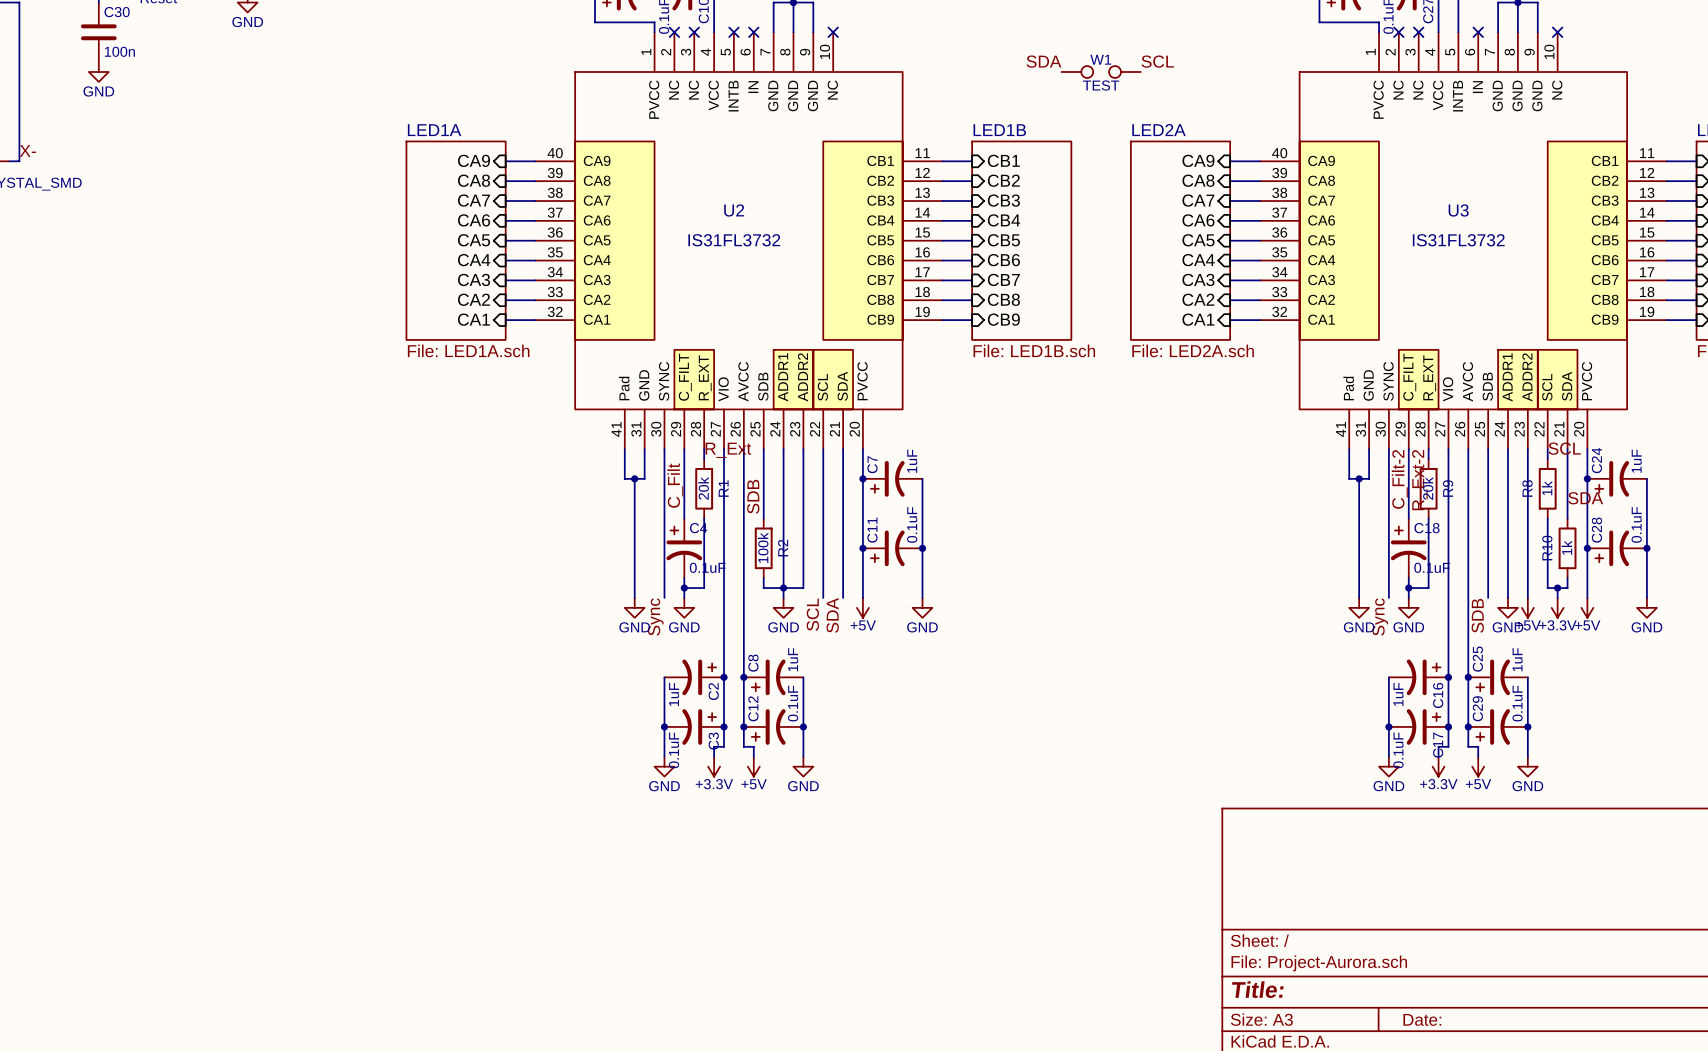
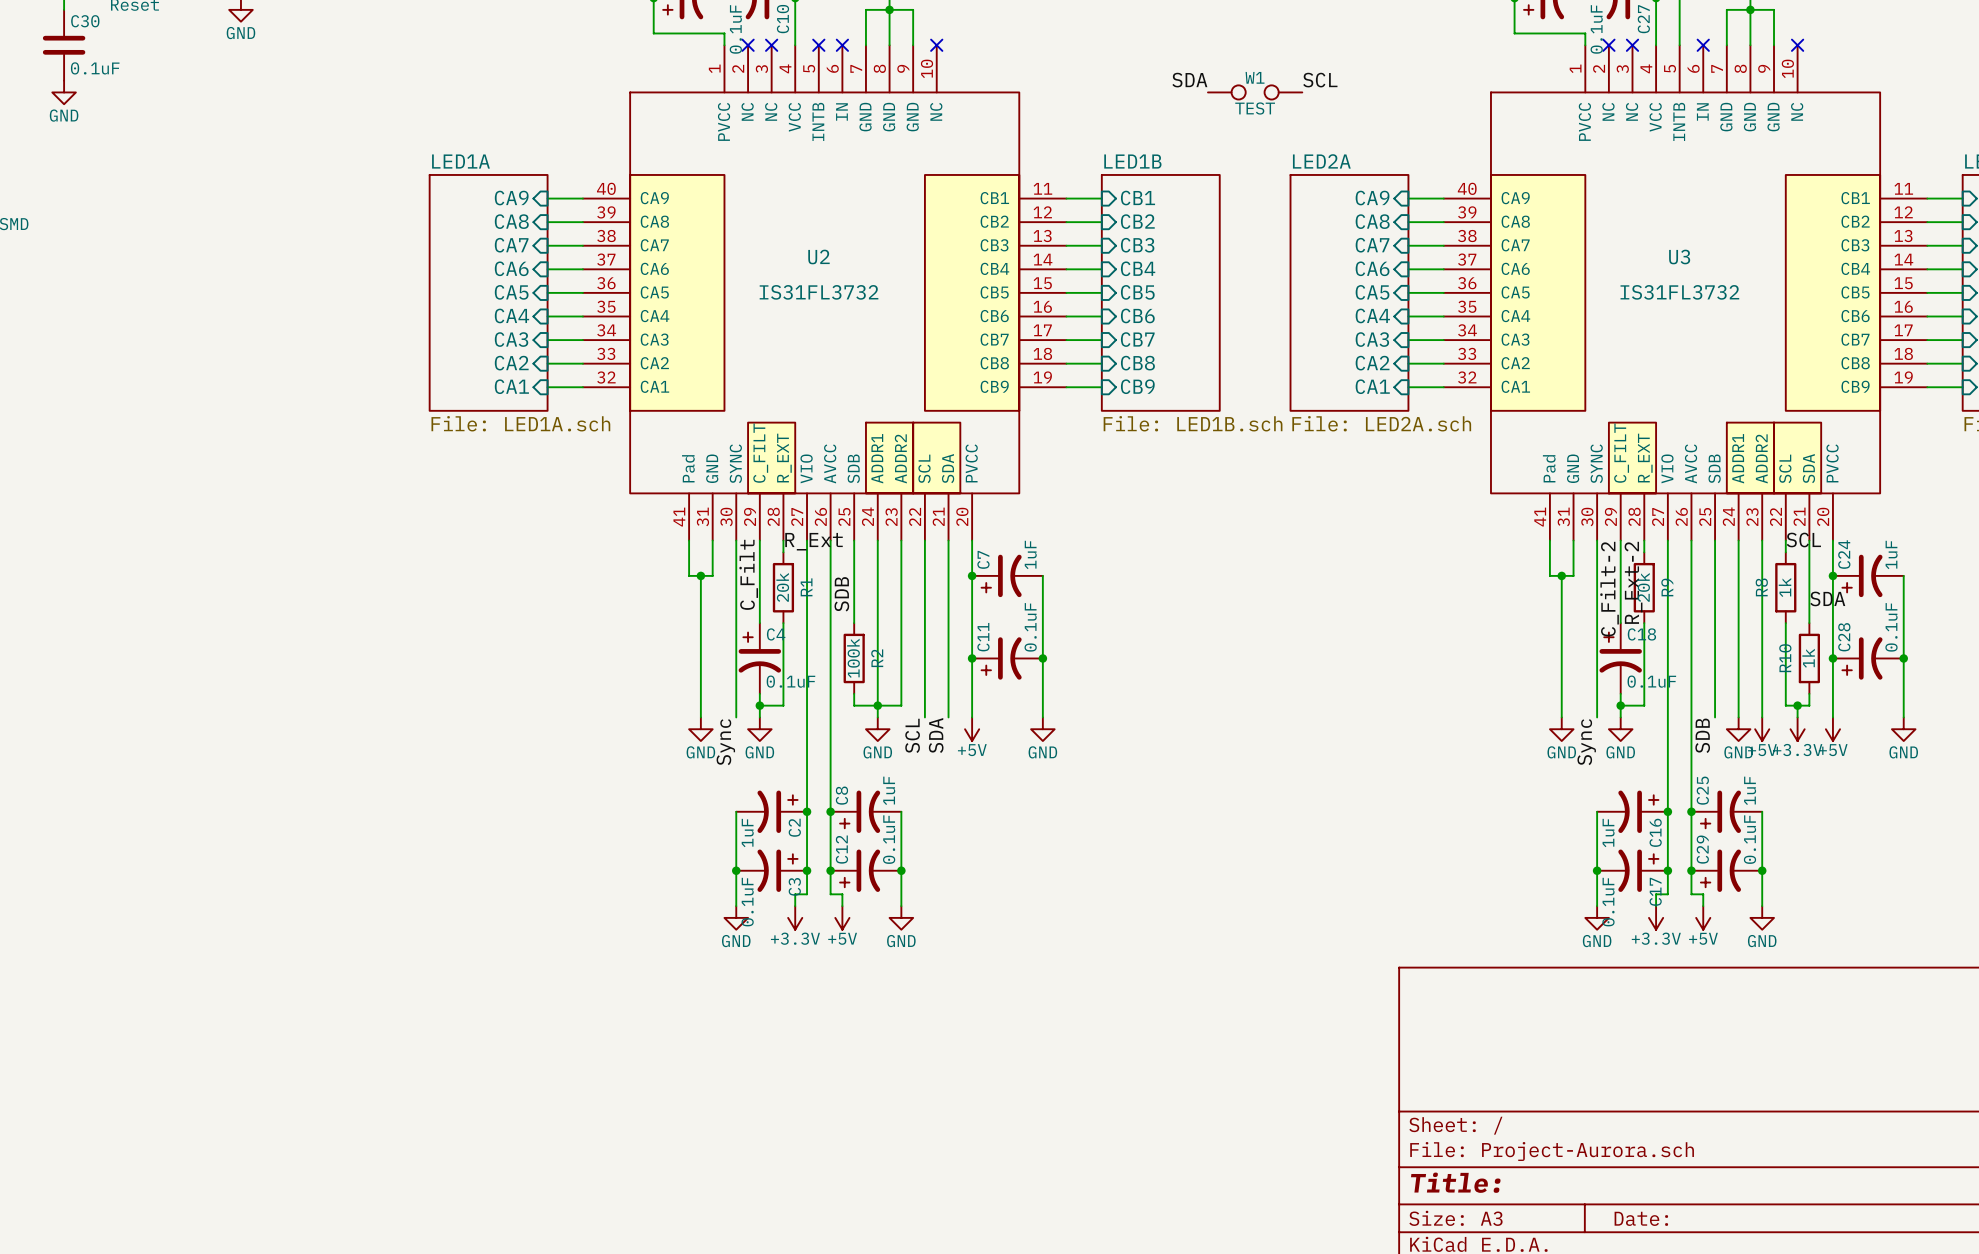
C30 value: 100n (119, 51) -> 0.1uF (95, 68)

